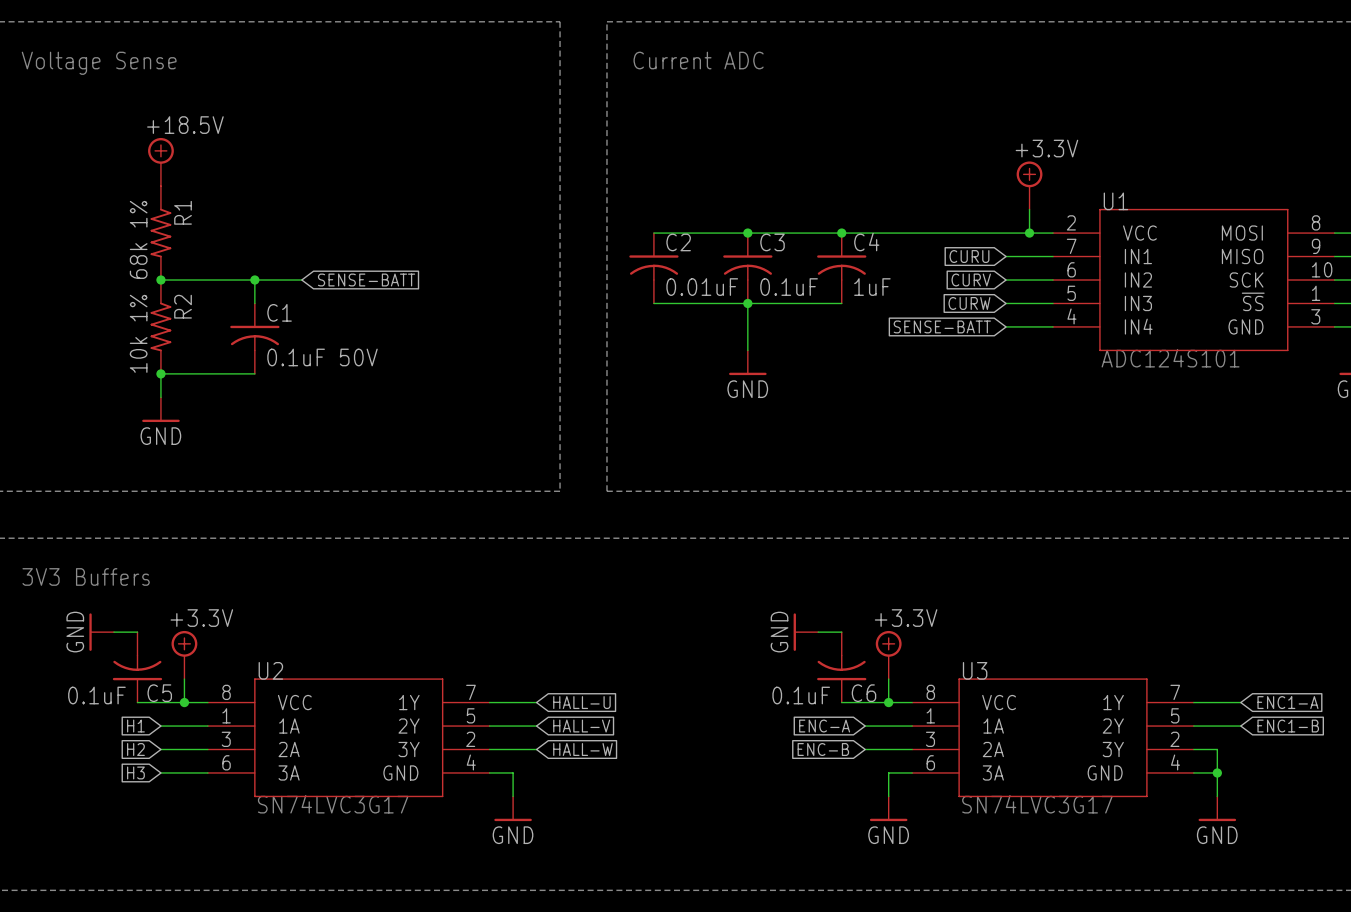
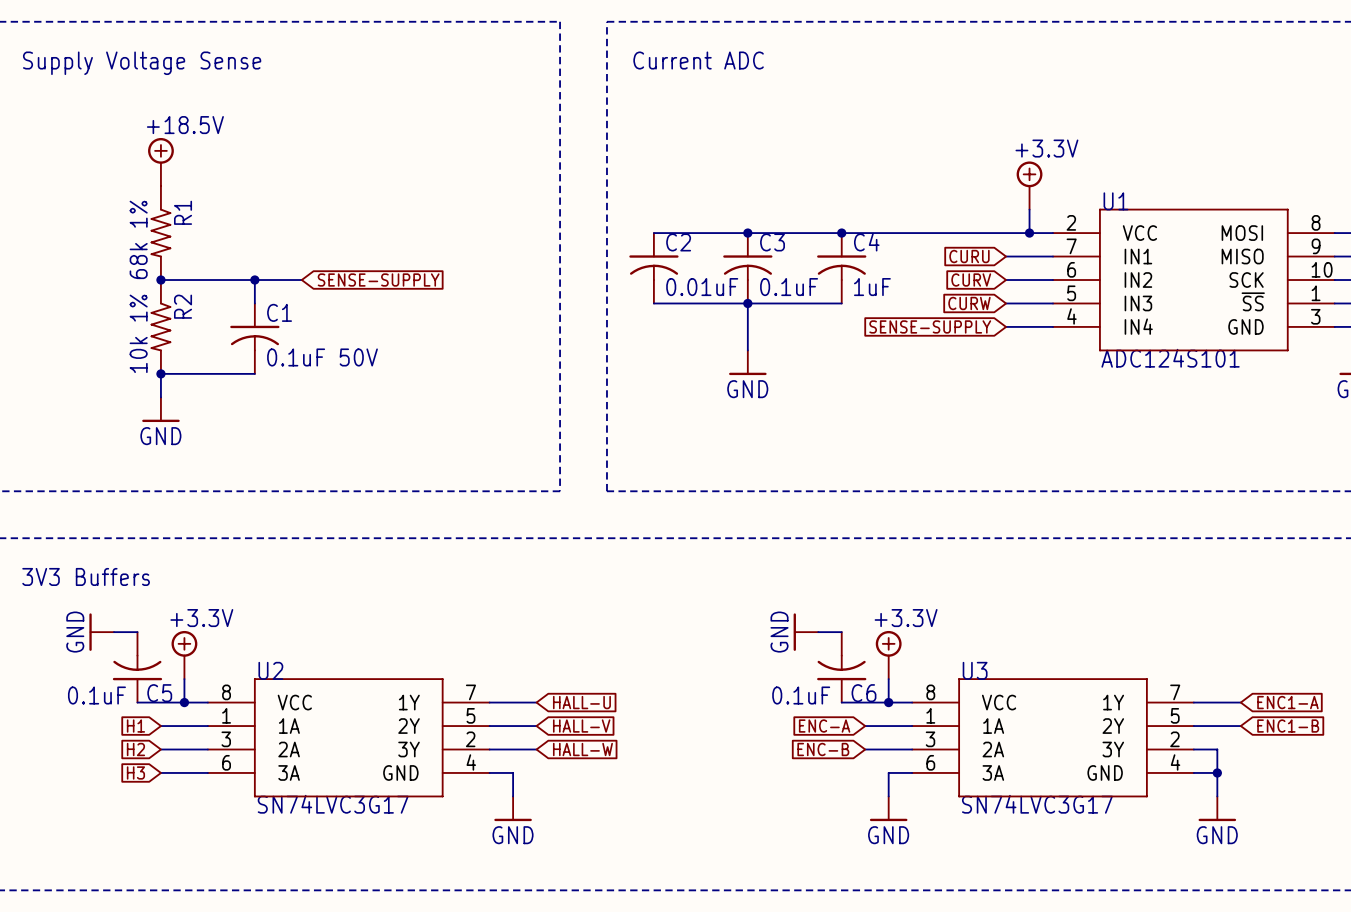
text: Voltage Sense (99, 63) -> Supply Voltage Sense (142, 63)
global label: SENSE-BATT (366, 280) -> SENSE-SUPPLY (378, 280)
global label: SENSE-BATT (942, 326) -> SENSE-SUPPLY (930, 326)

